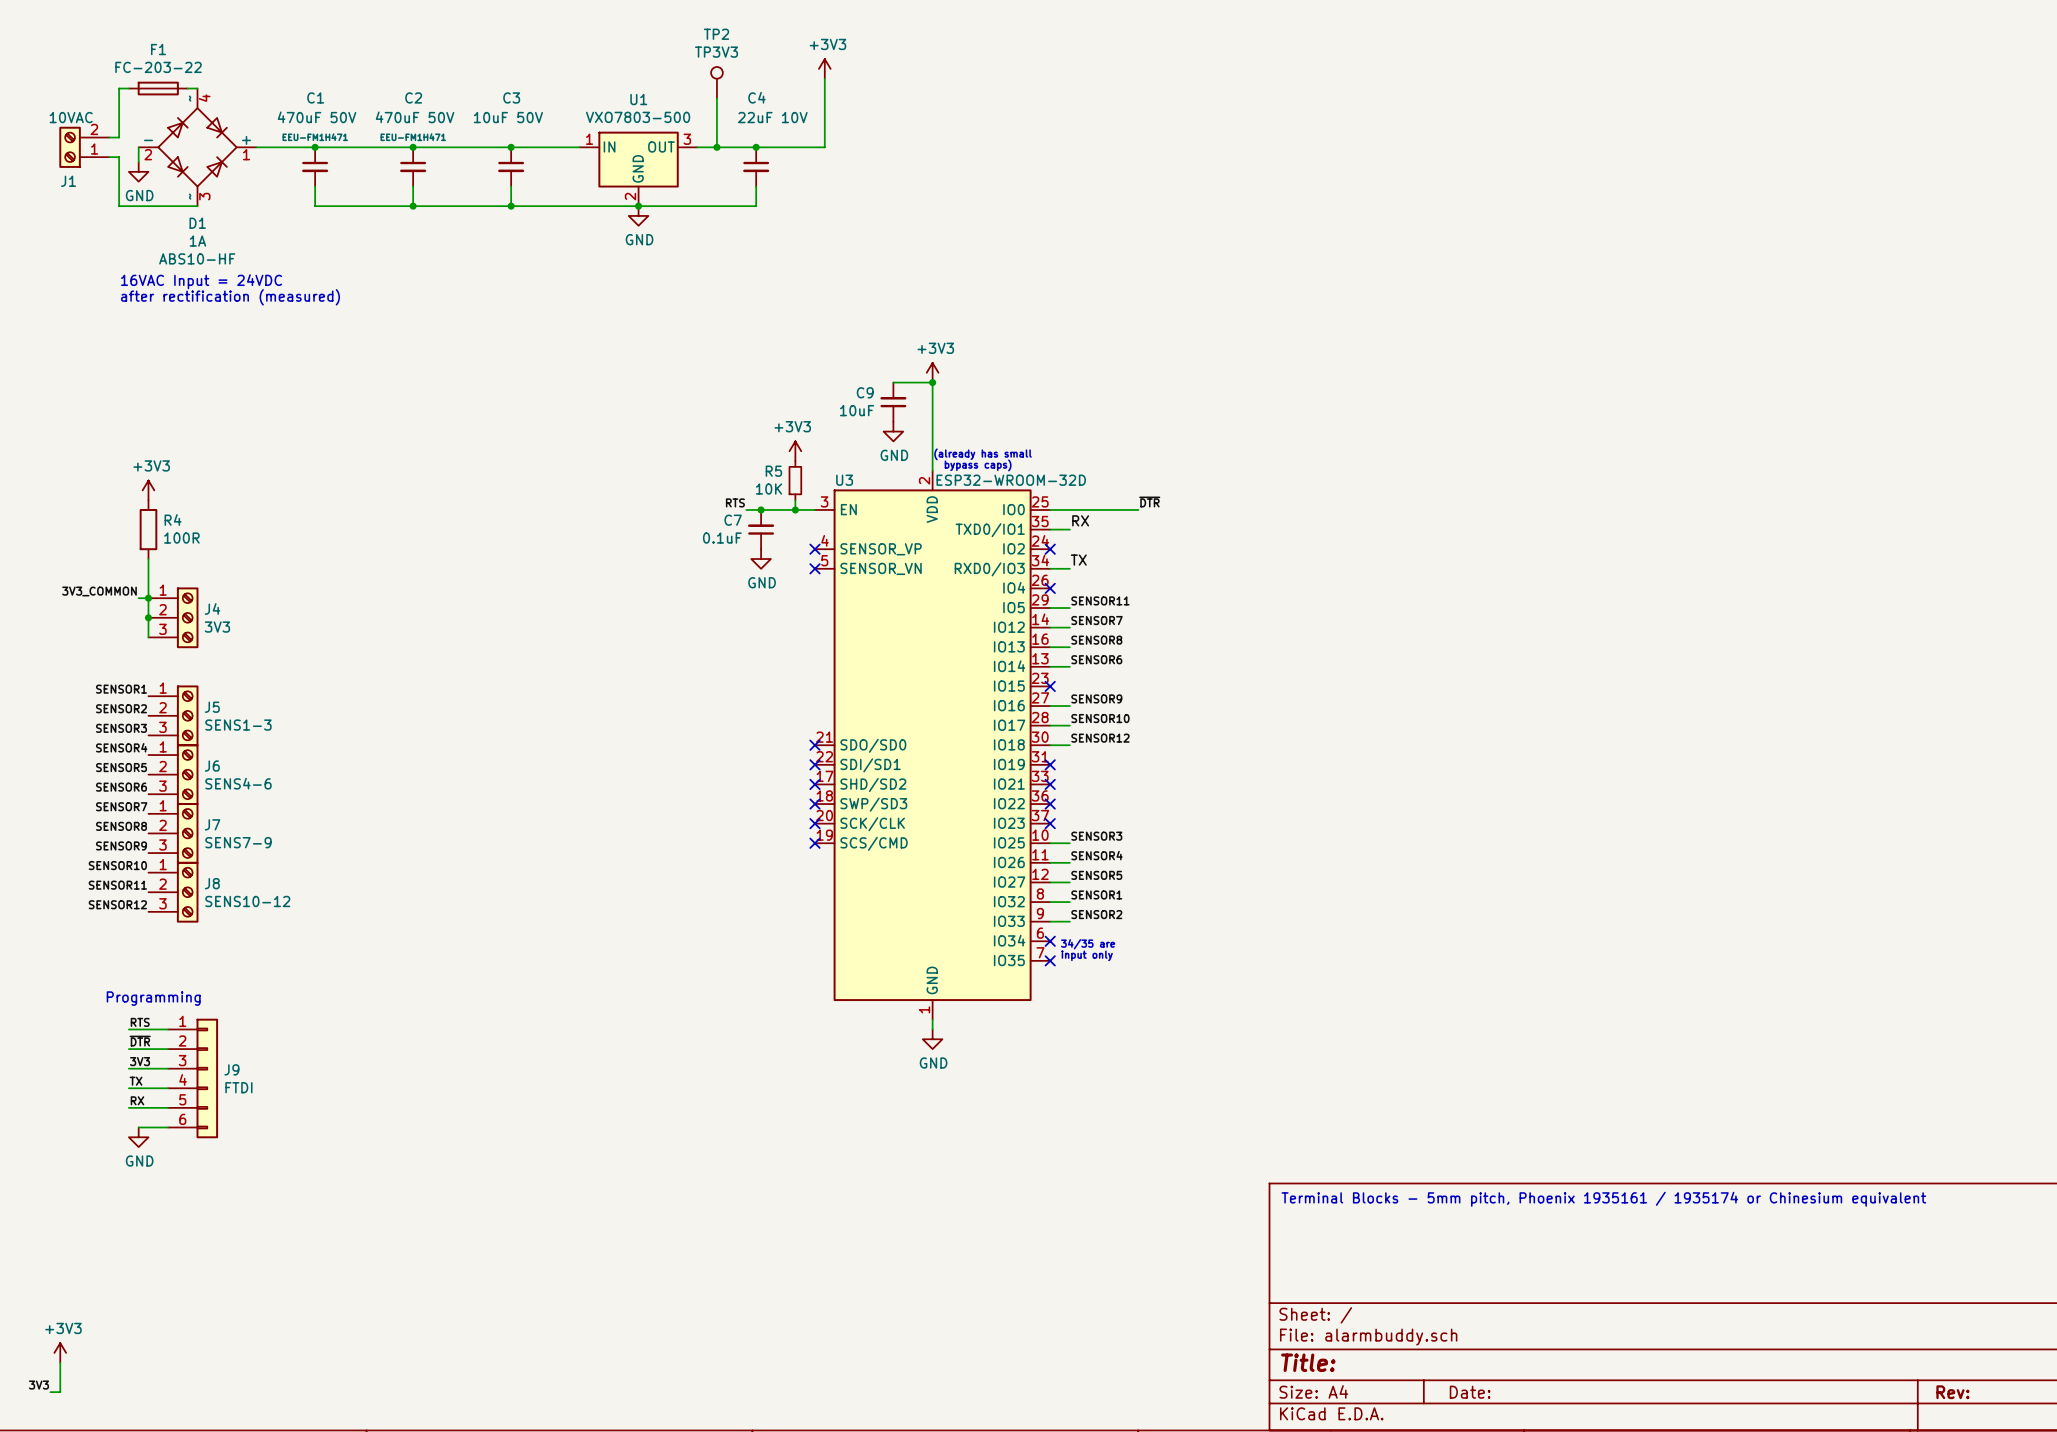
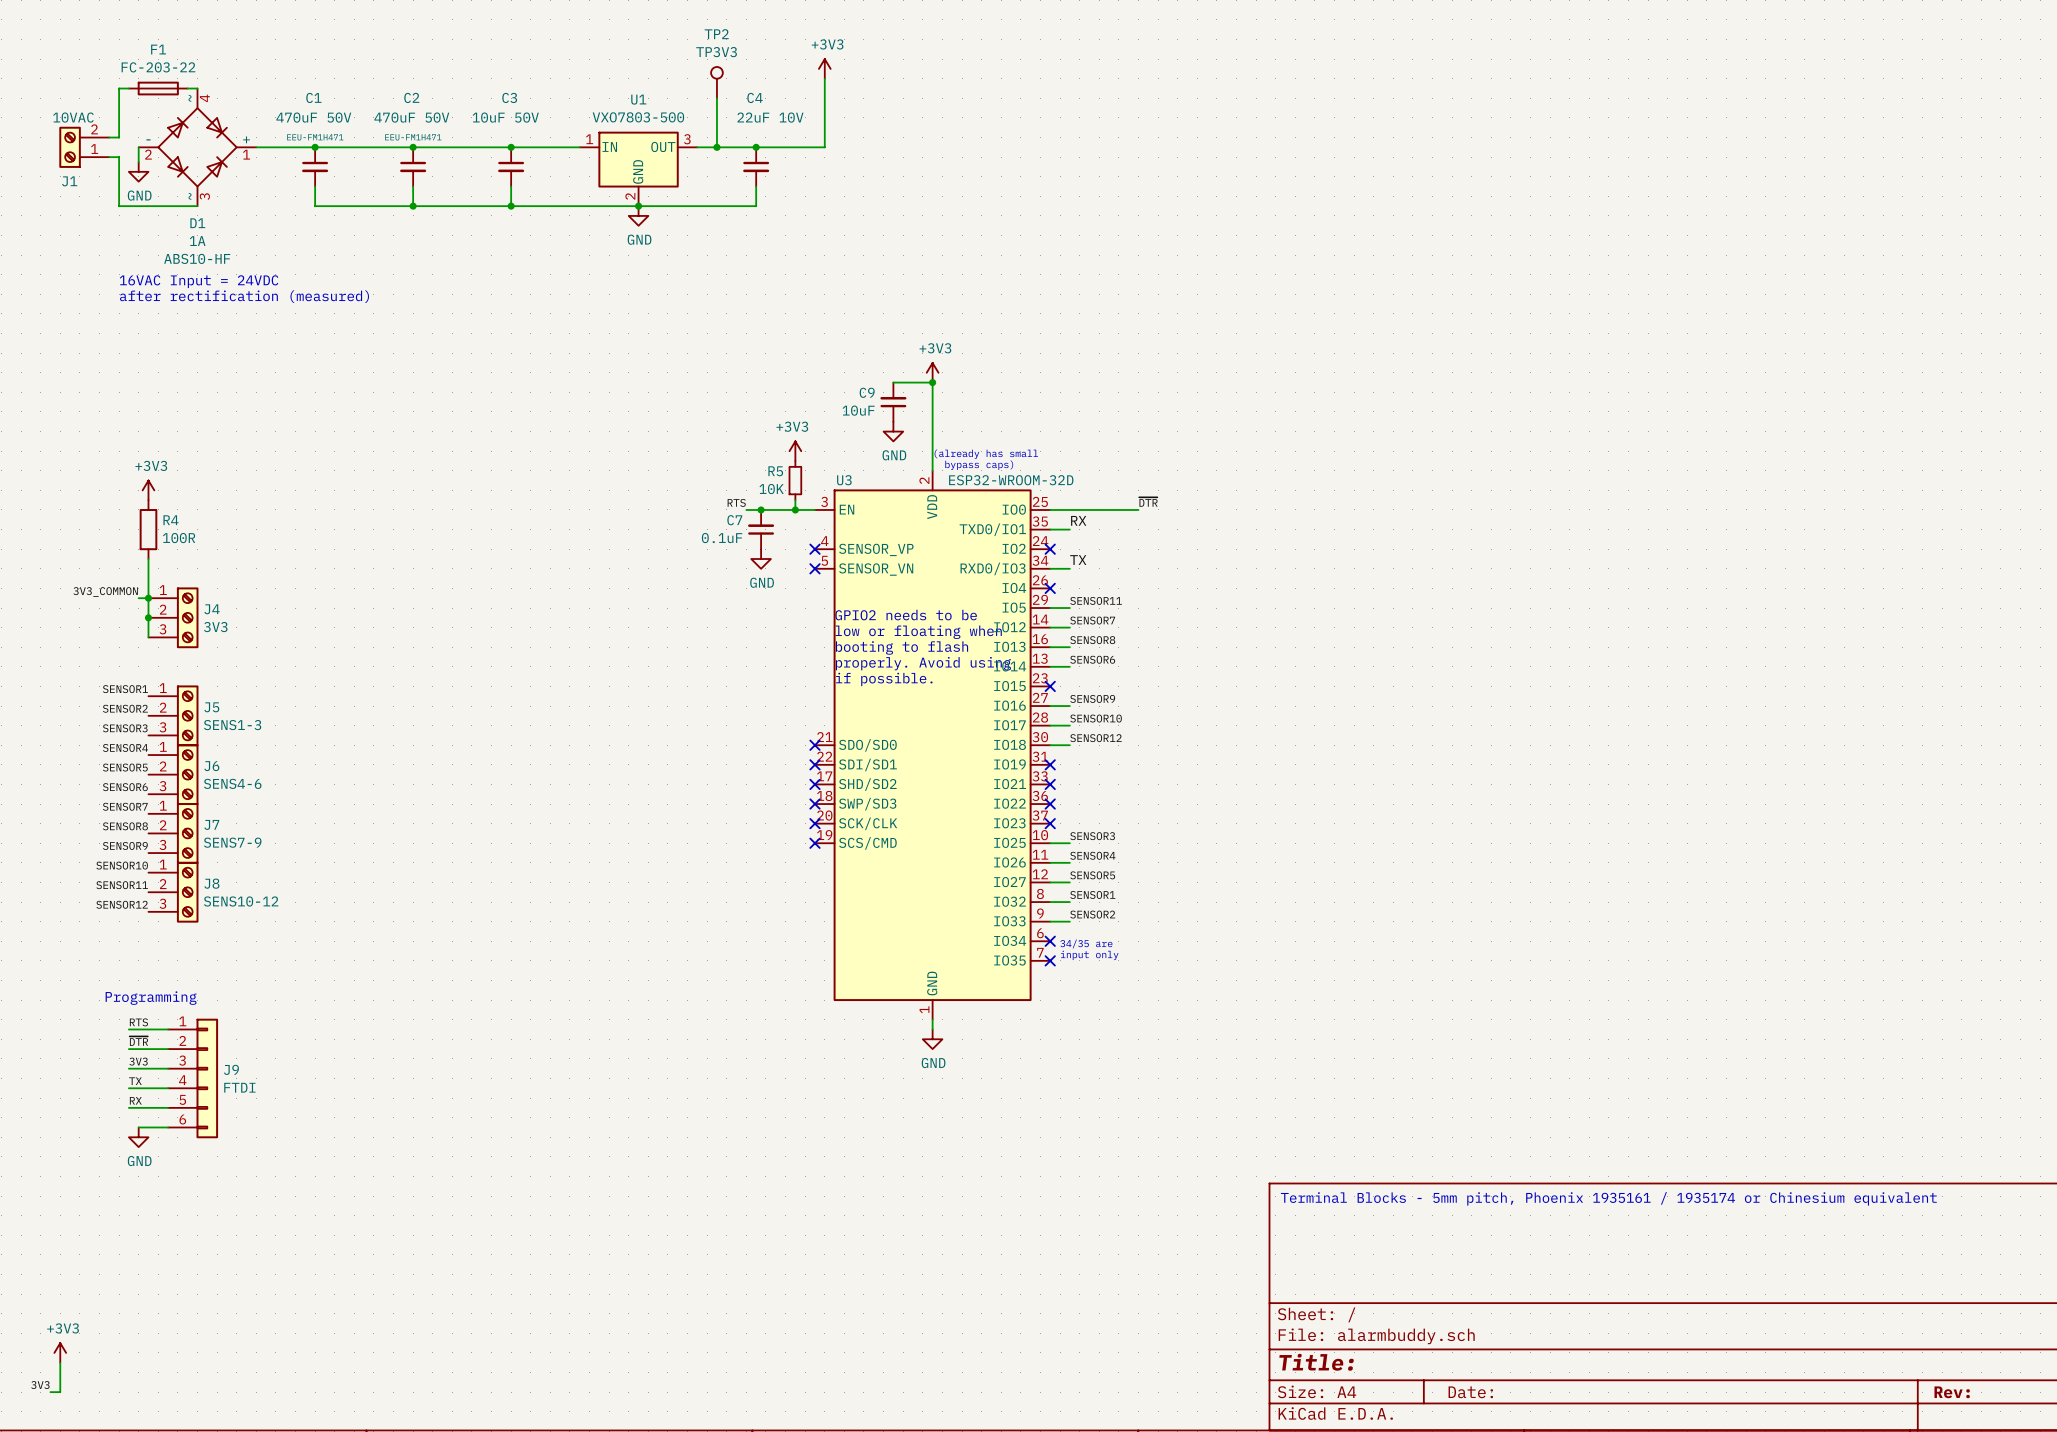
text: none -> GPIO2 needs to be (906, 615)
text: none -> low or floating when (918, 632)
text: none -> booting to flash (902, 647)
text: none -> properly. Avoid using (923, 663)
text: none -> if possible. (884, 679)

